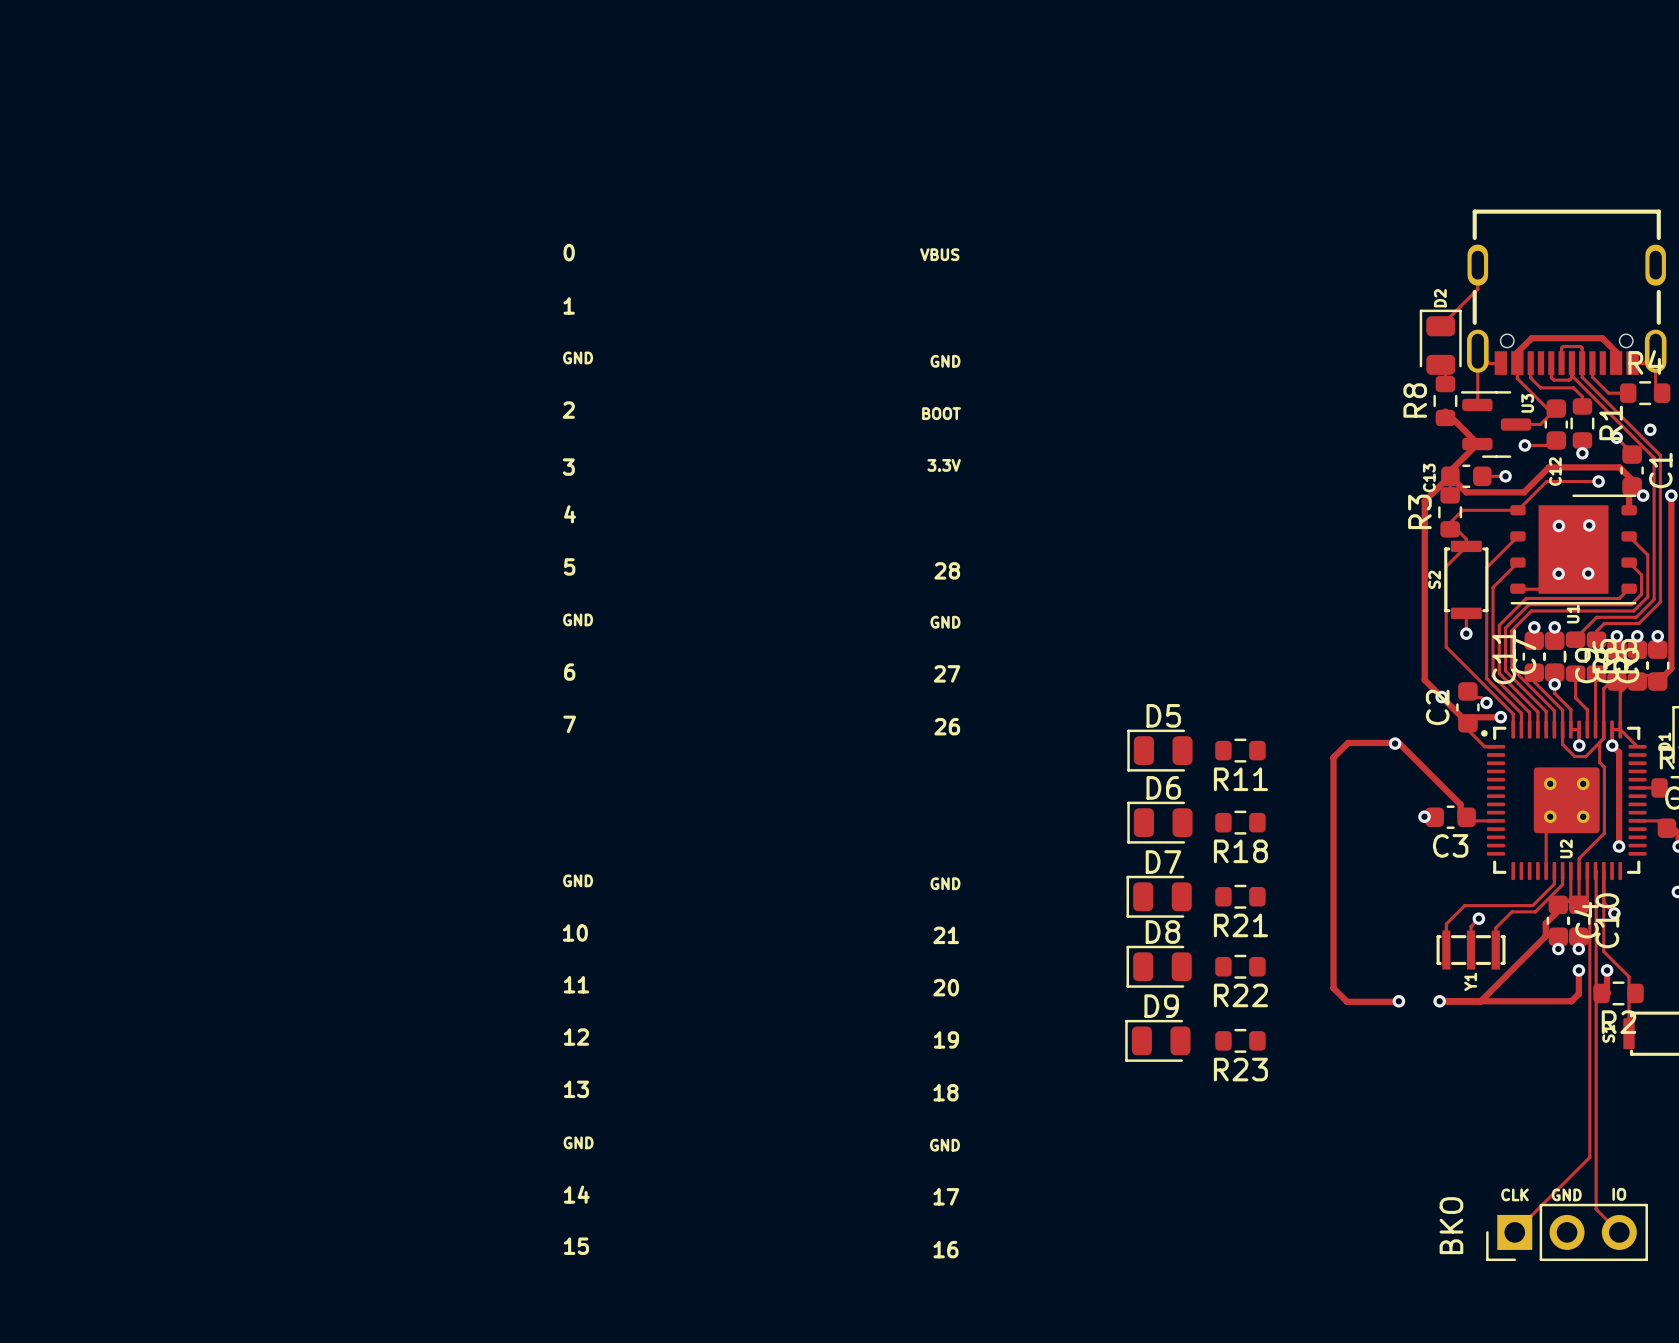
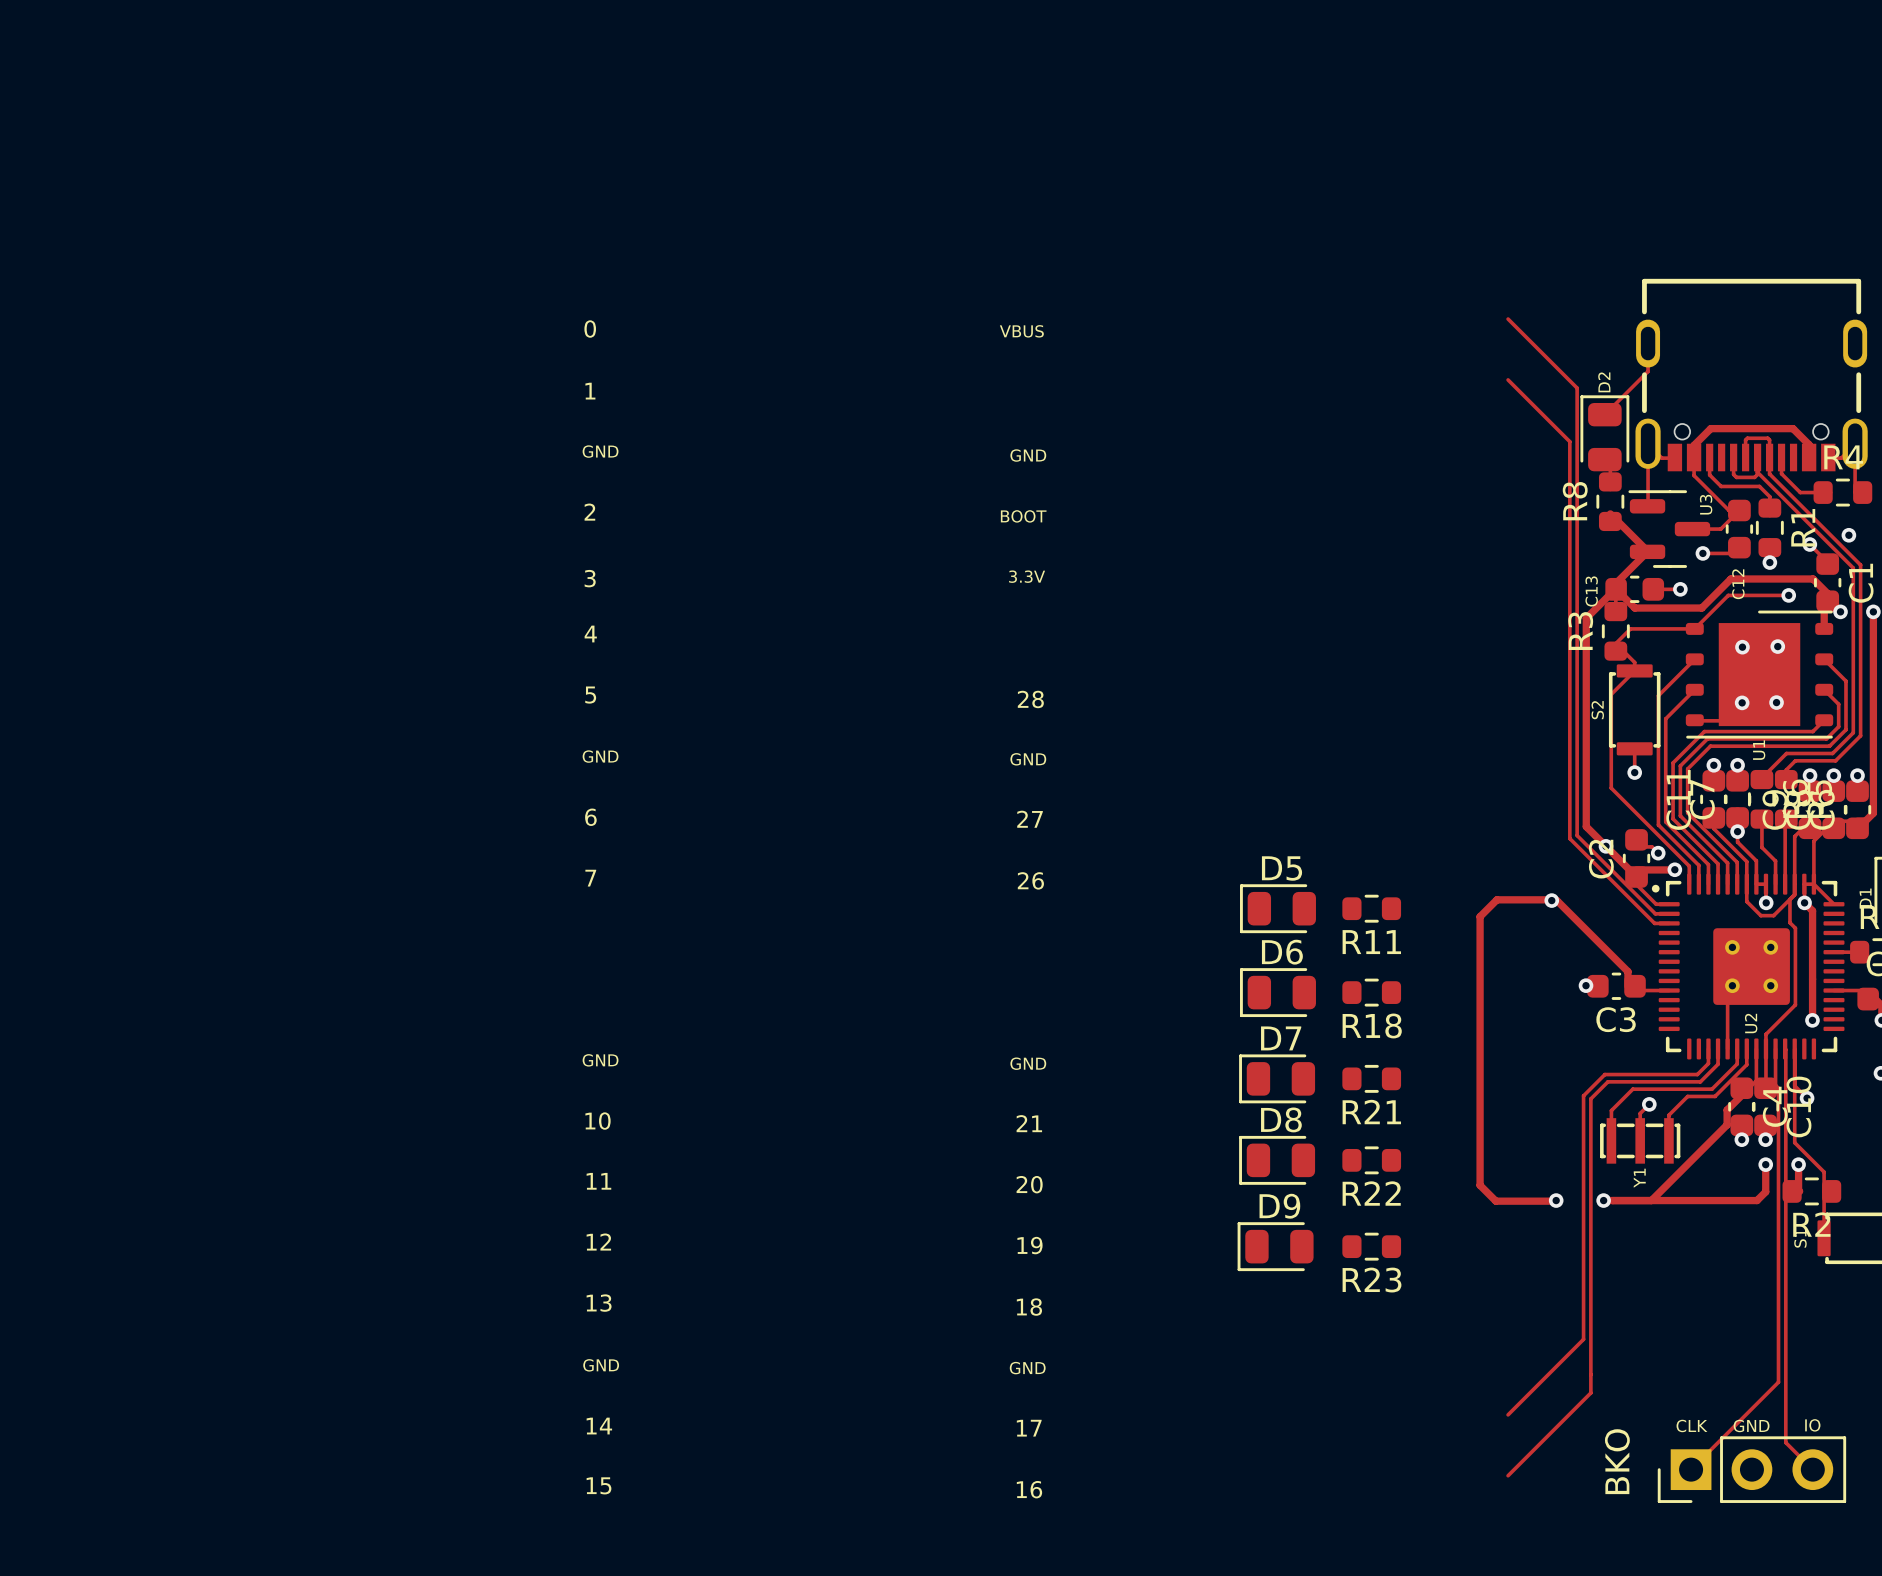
track: none -> (1508, 319) (1577, 388) (1577, 835) (1655, 913) (1669, 913)
track: none -> (1508, 379) (1569, 441) (1569, 838) (1654, 923) (1669, 923)
track: none -> (1708, 1048) (1708, 1063) (1697, 1074) (1604, 1074) (1583, 1095) (1583, 1339) (1508, 1414)
track: none -> (1718, 1048) (1718, 1064) (1700, 1081) (1607, 1081) (1590, 1098) (1590, 1392) (1508, 1475)

